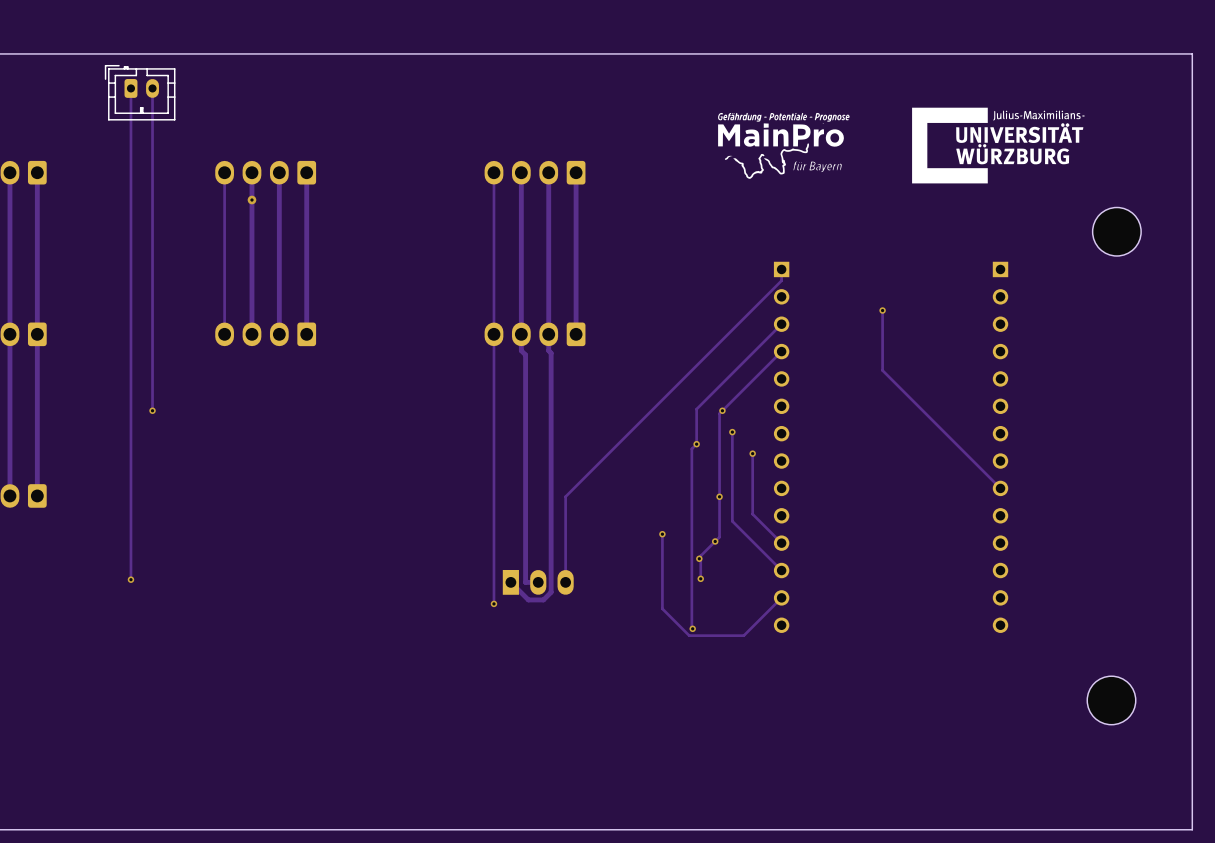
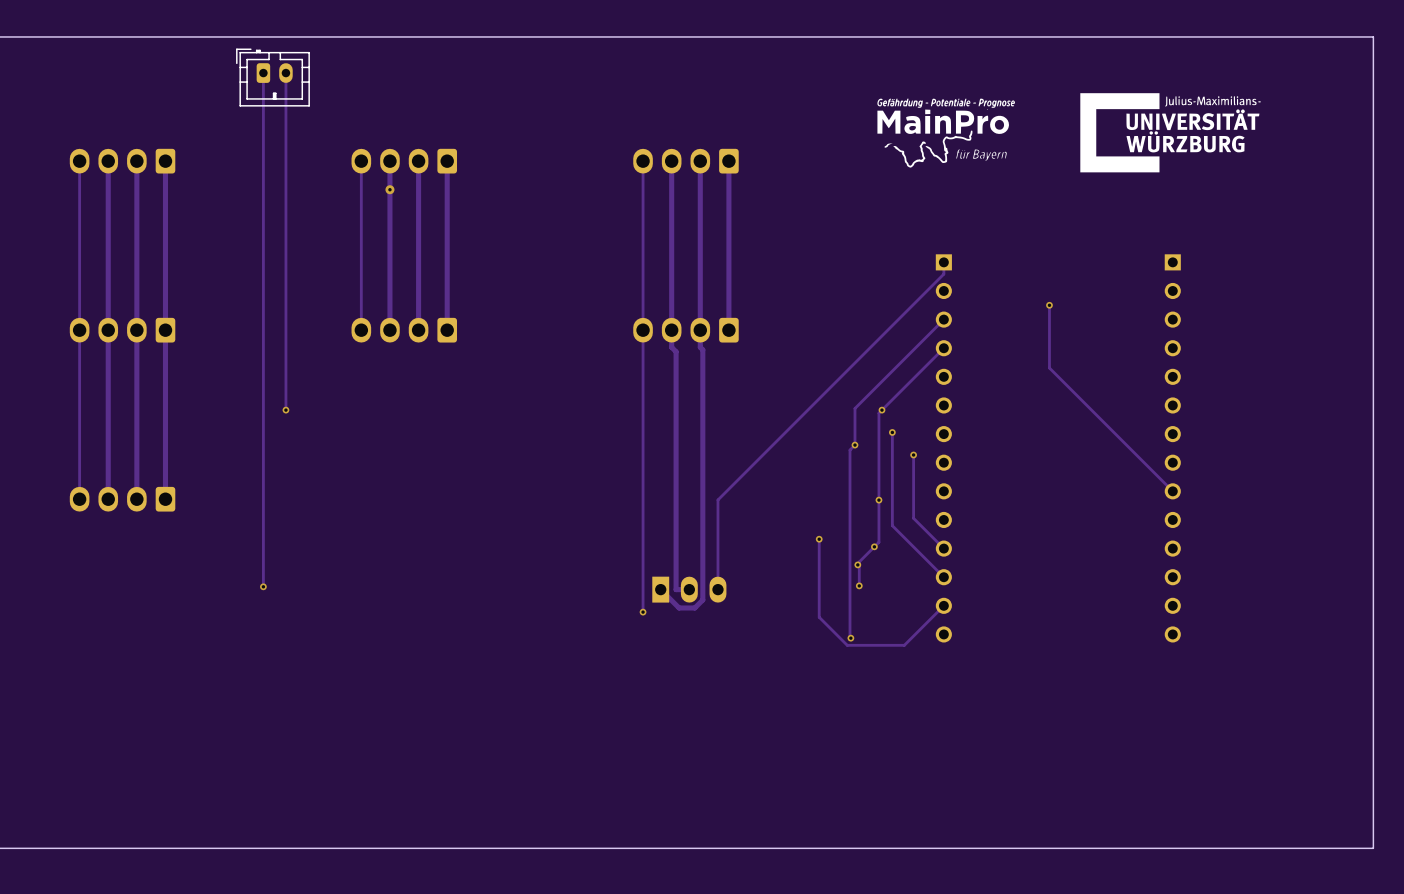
part: (1116, 231) -> none
part: (1111, 700) -> none

